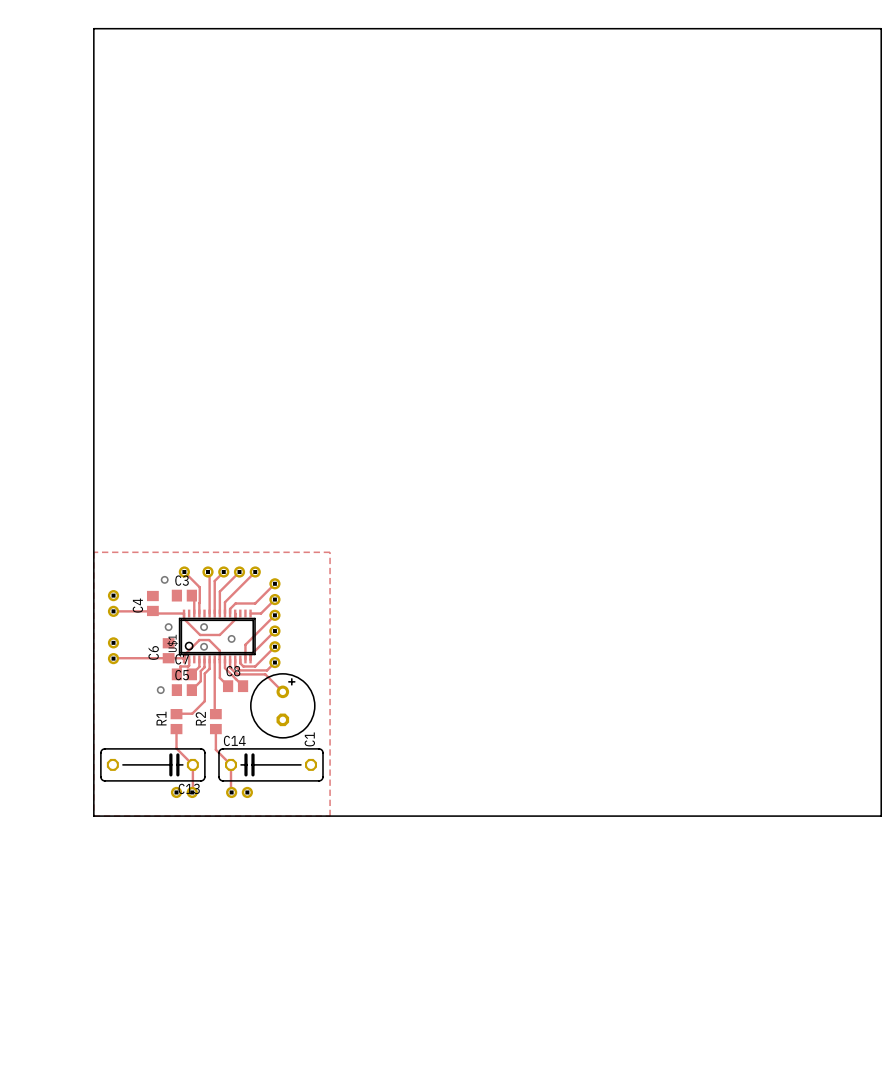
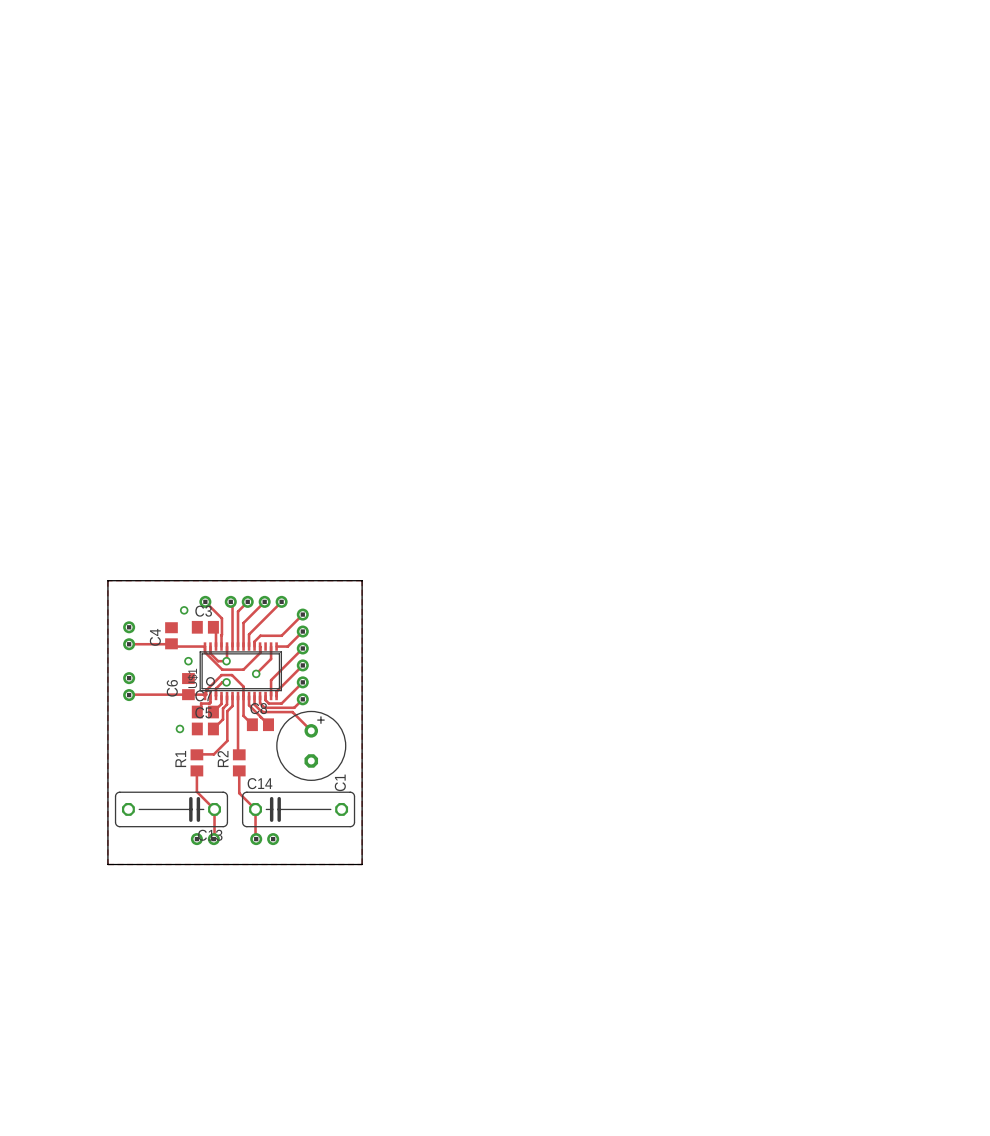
board edge: (93, 552) (93, 28) (881, 28) (881, 816) (330, 816) -> (107, 580) (362, 580) (362, 864)
track: none -> (210, 646) (210, 653) (218, 661) (227, 660) (227, 646)
track: none -> (271, 646) (271, 659) (256, 673)
track: none -> (226, 682) (222, 682) (215, 688) (215, 695)

